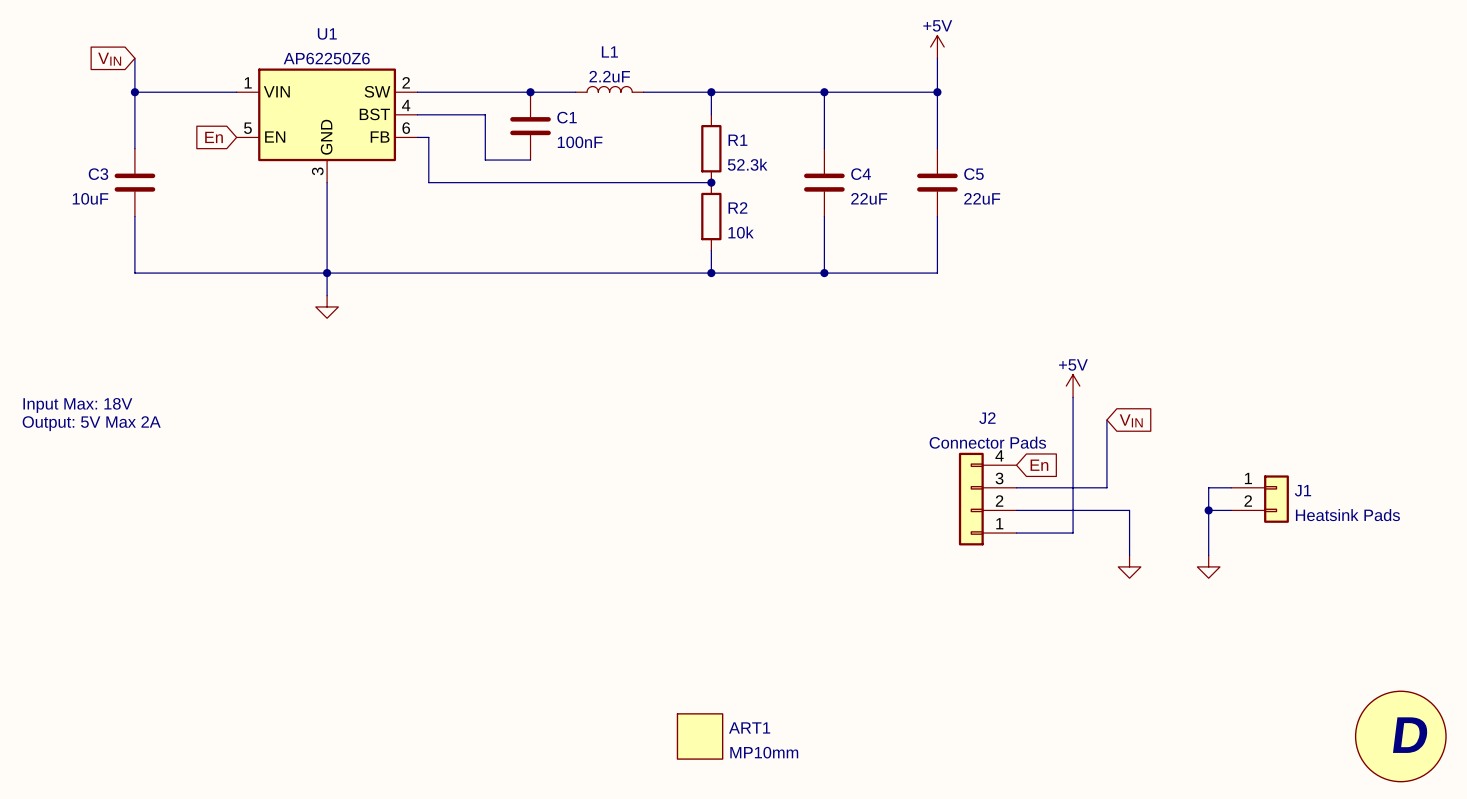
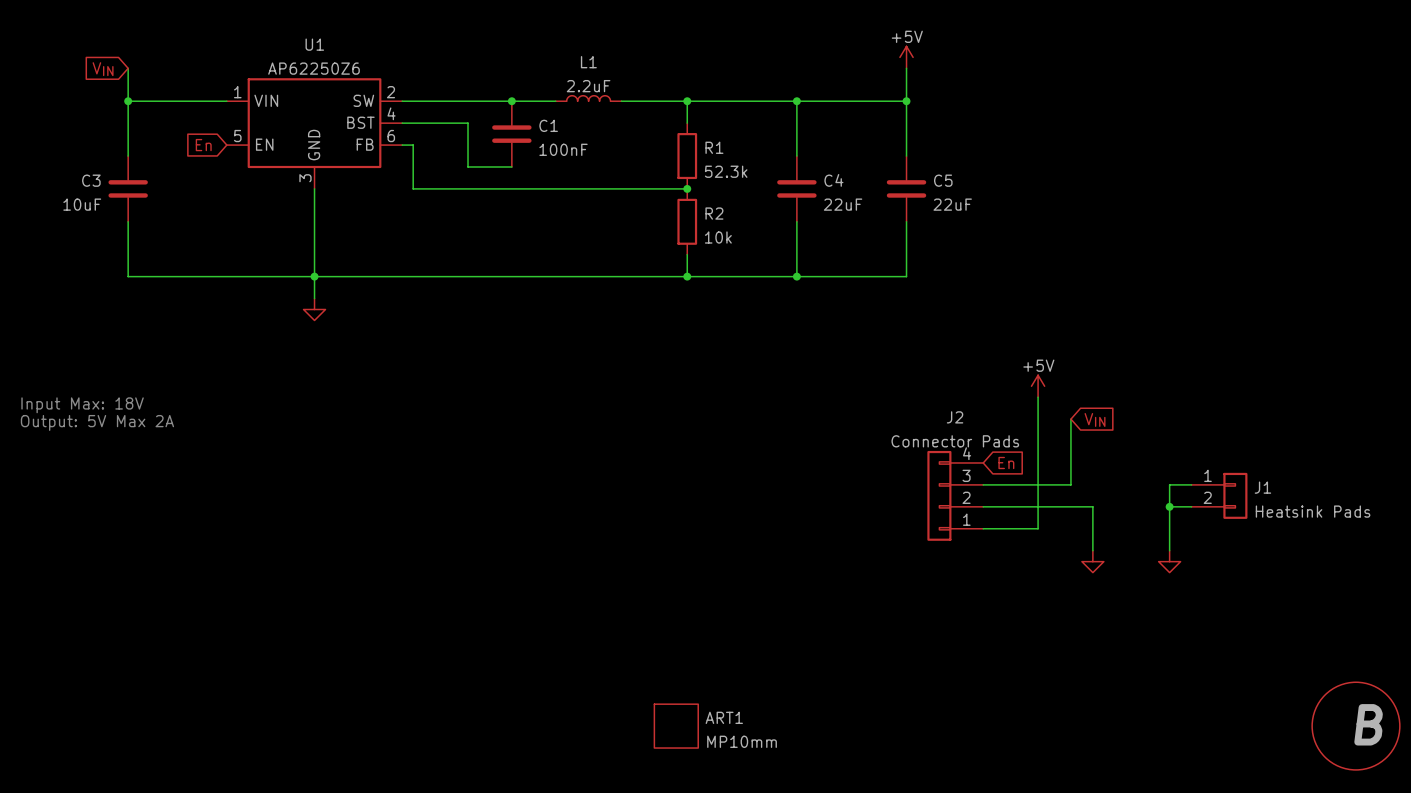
part value: D (1410, 735) -> B (1368, 724)

